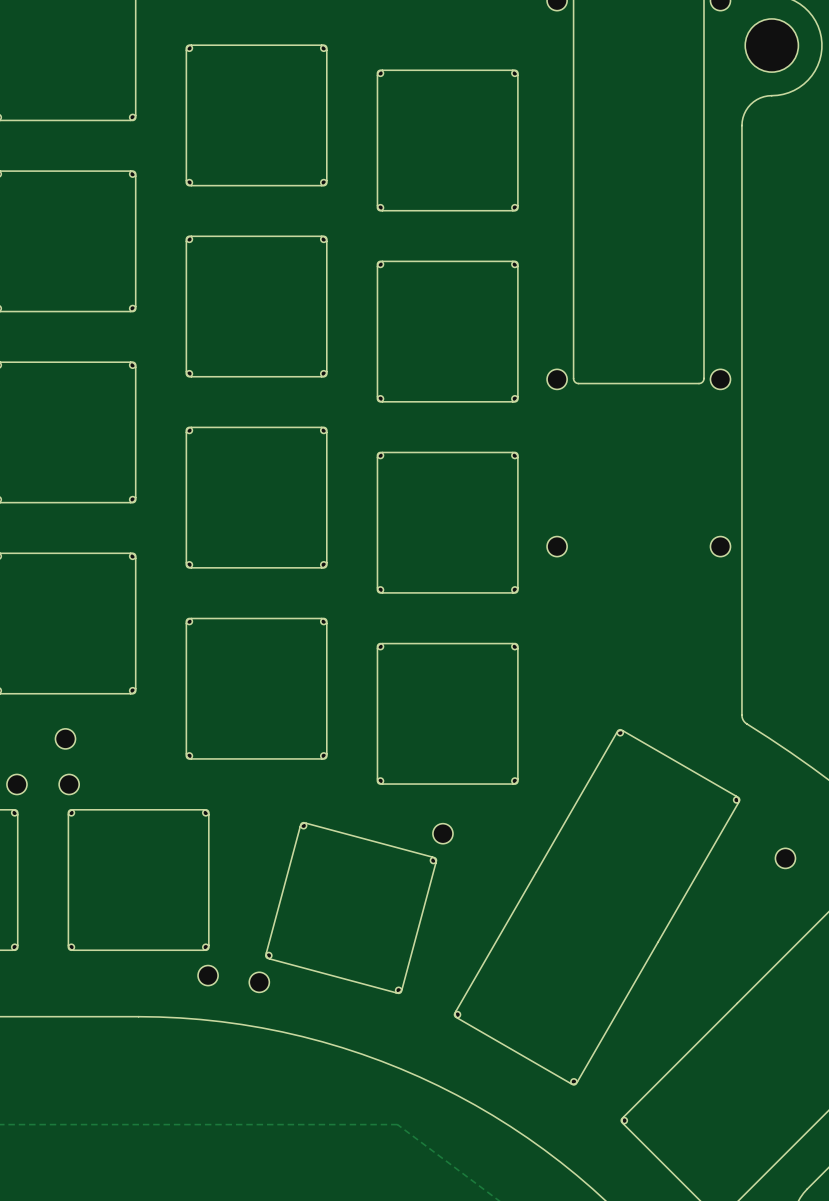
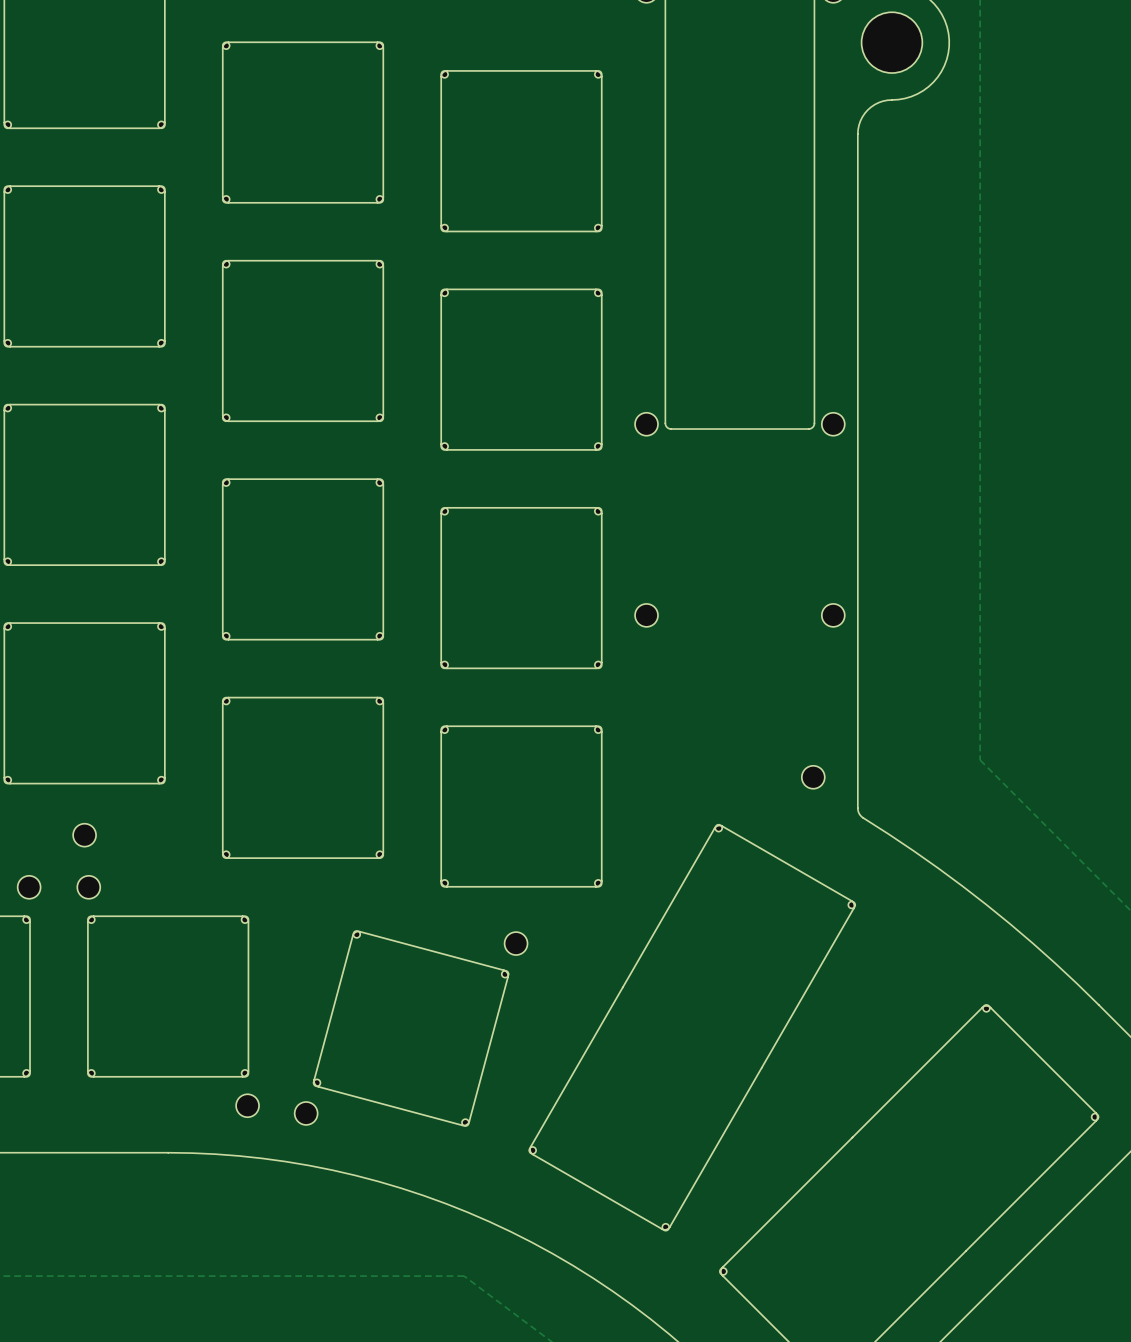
part position: (785, 858) -> (813, 777)

